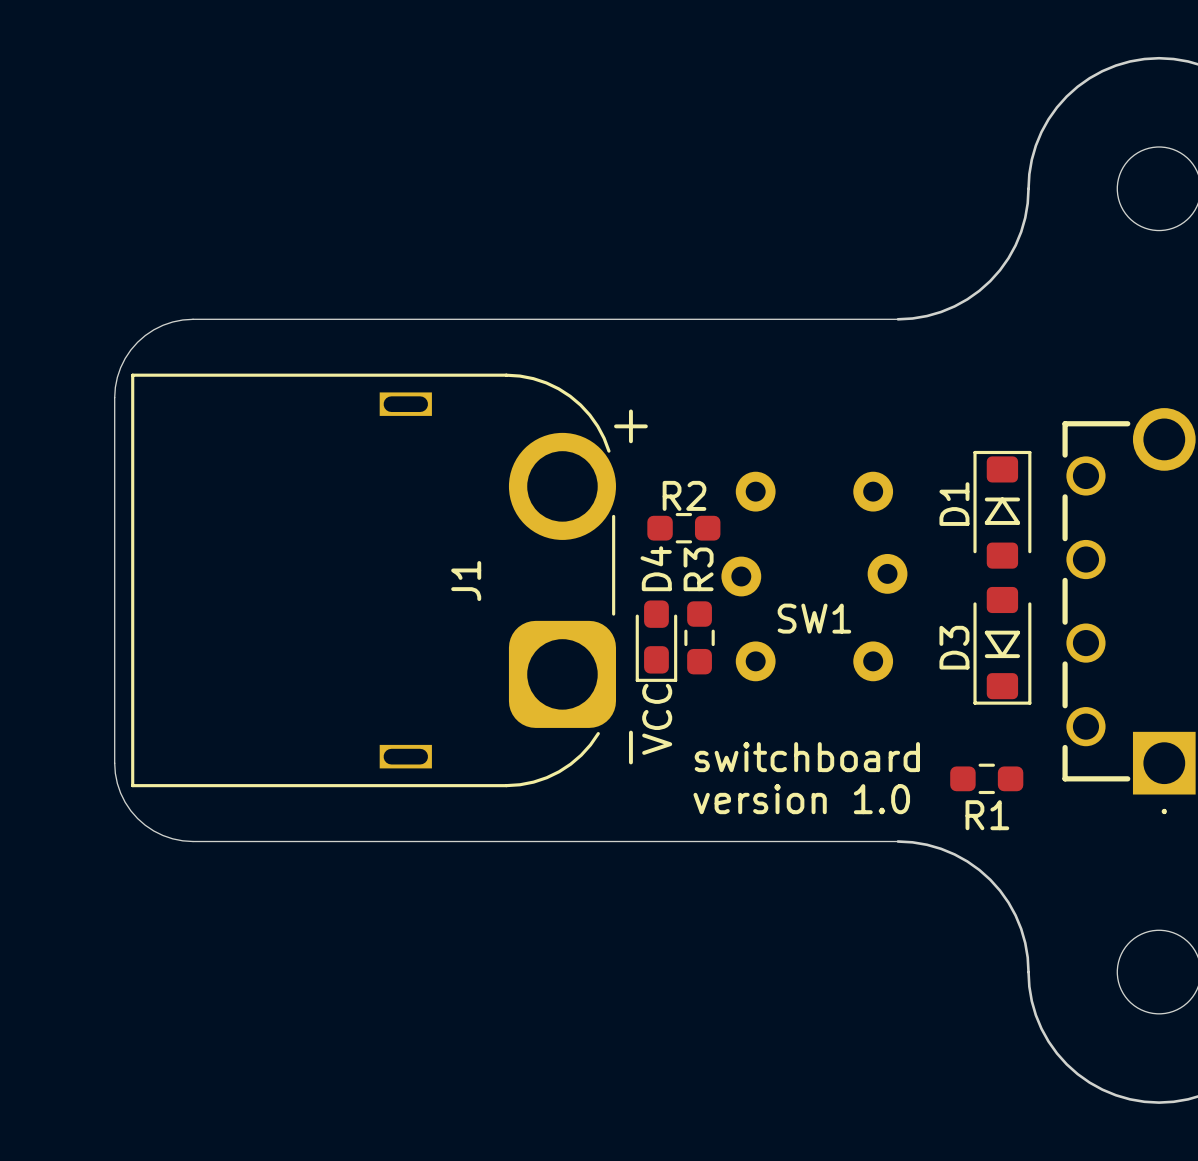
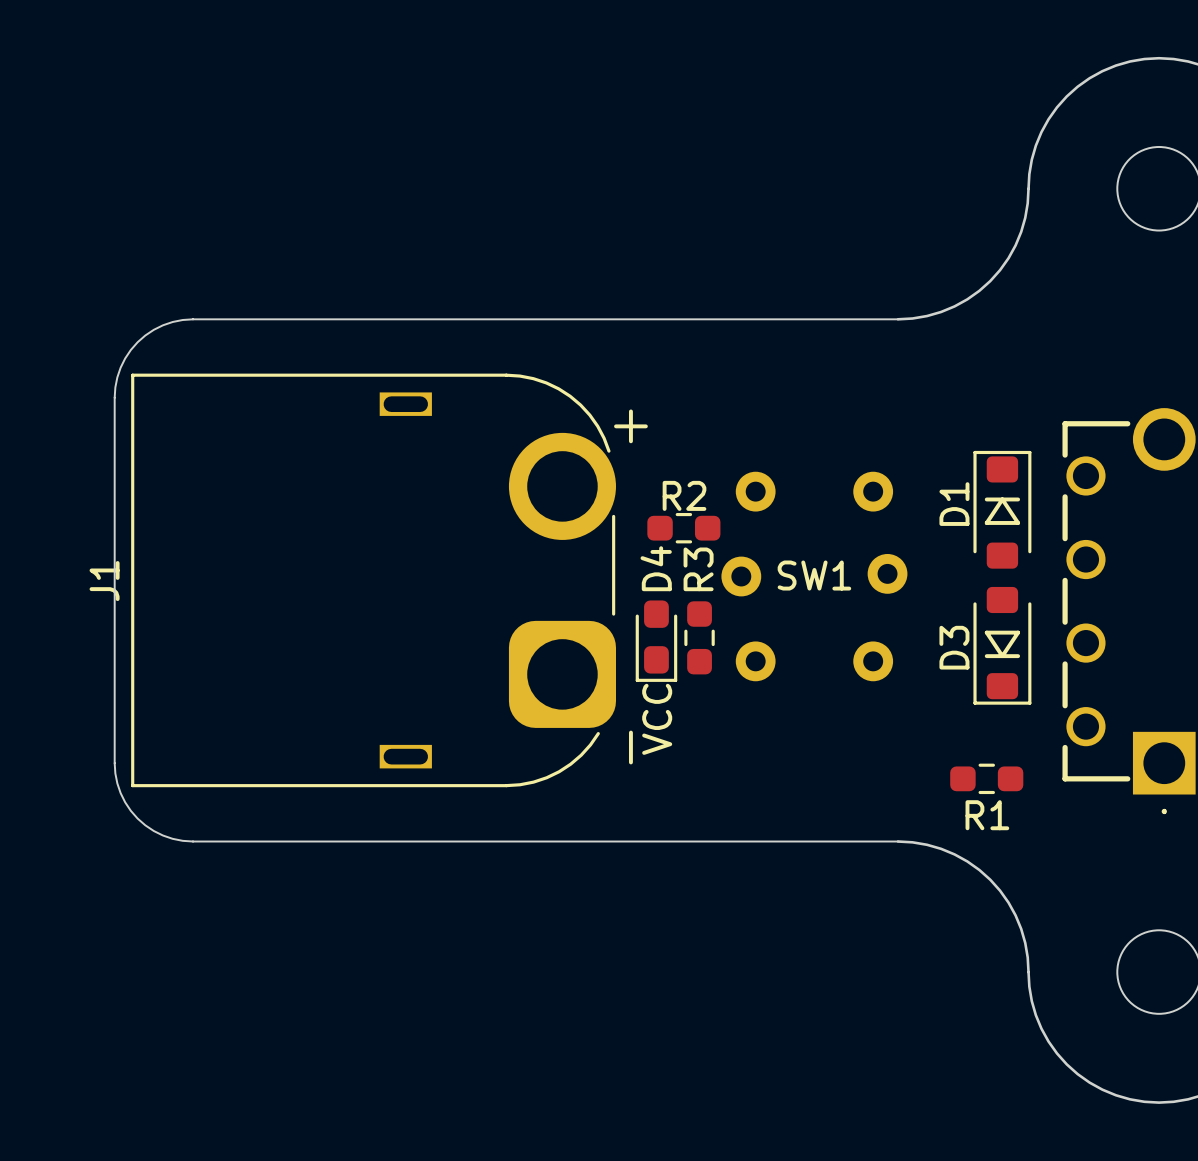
J1 name position: J1 (466, 581) -> J1 (104, 581)
SW1 name position: SW1 (814, 618) -> SW1 (814, 575)
text: switchboard (807, 757) -> none
text: version 1.0 (801, 799) -> none

